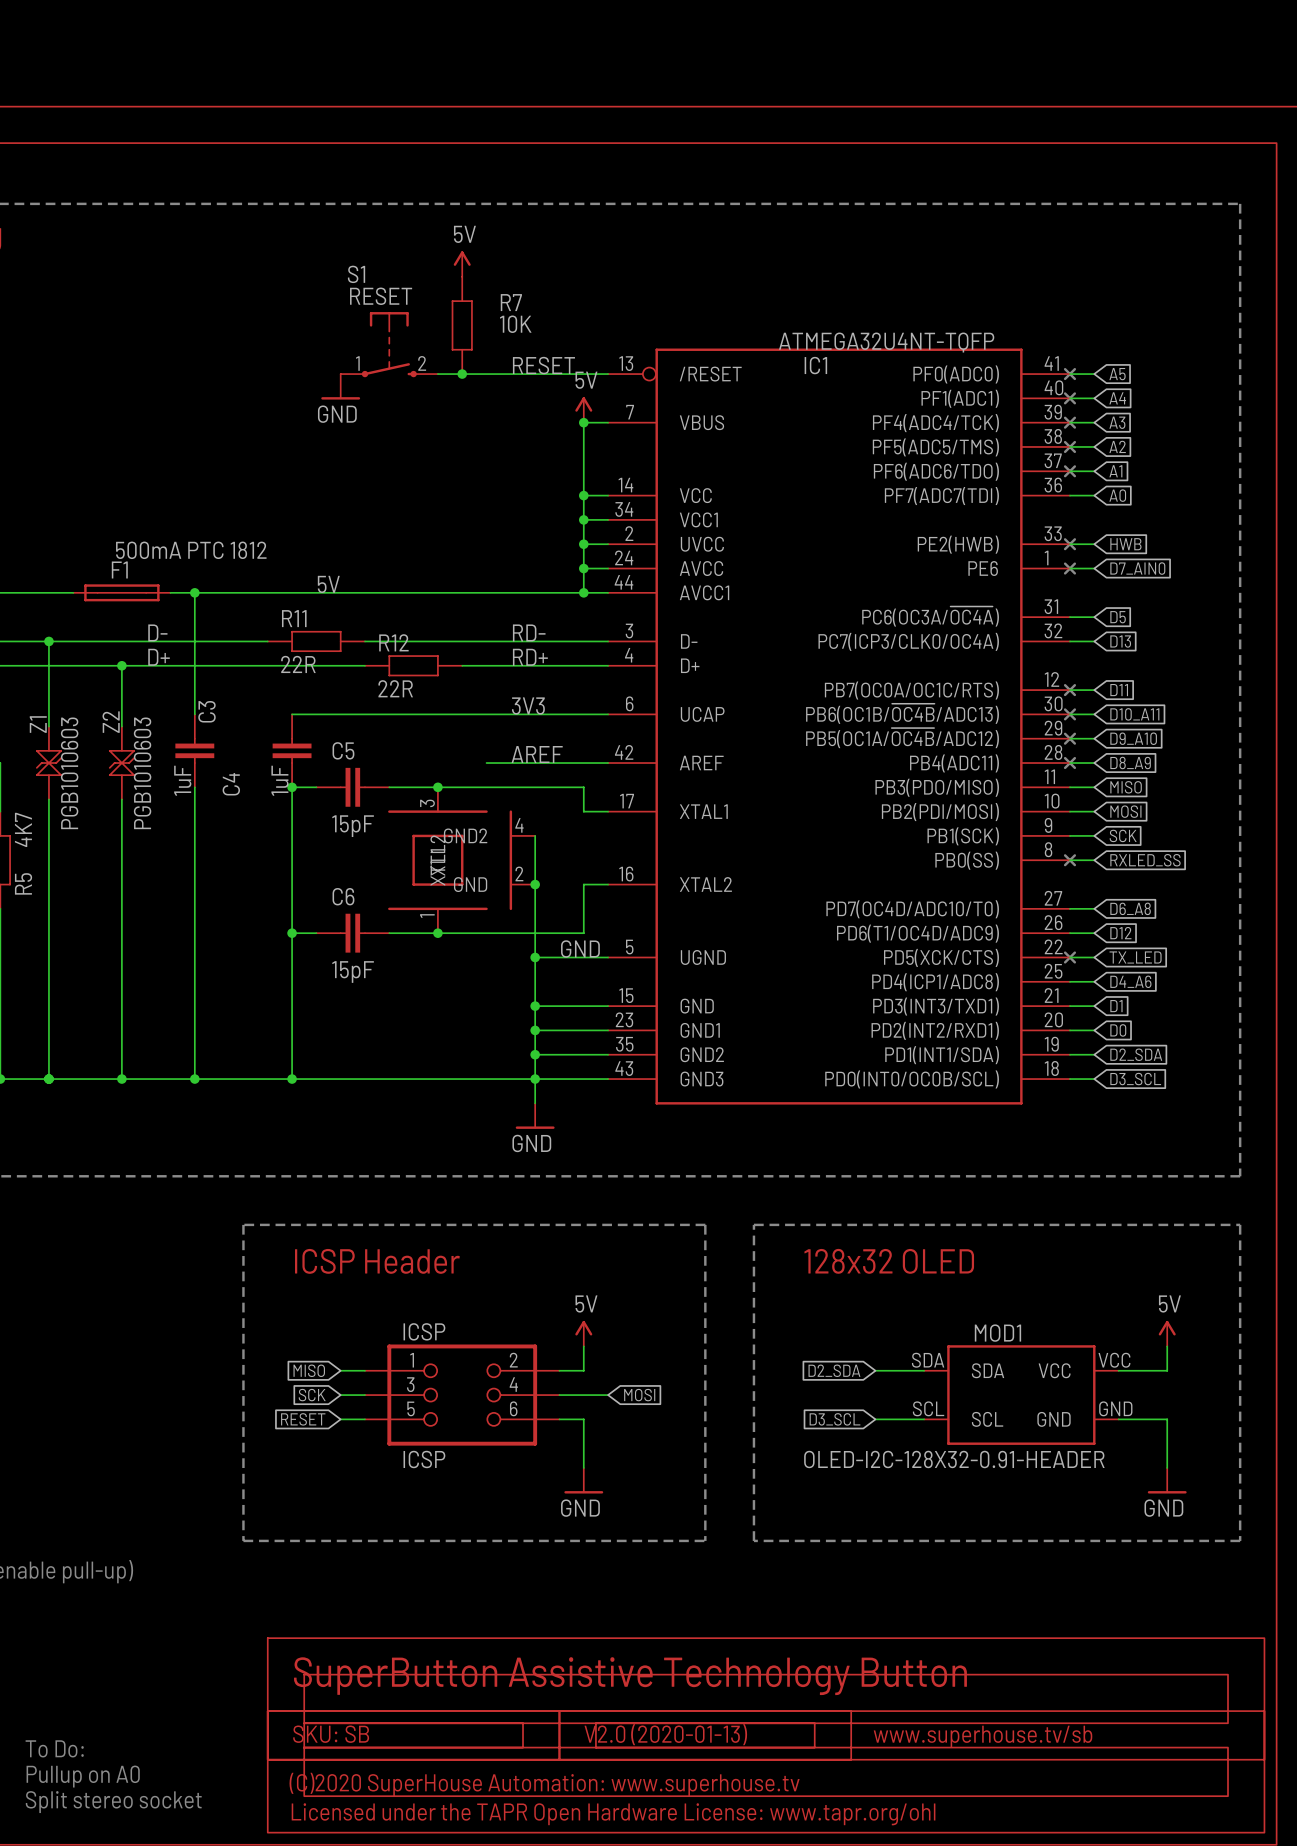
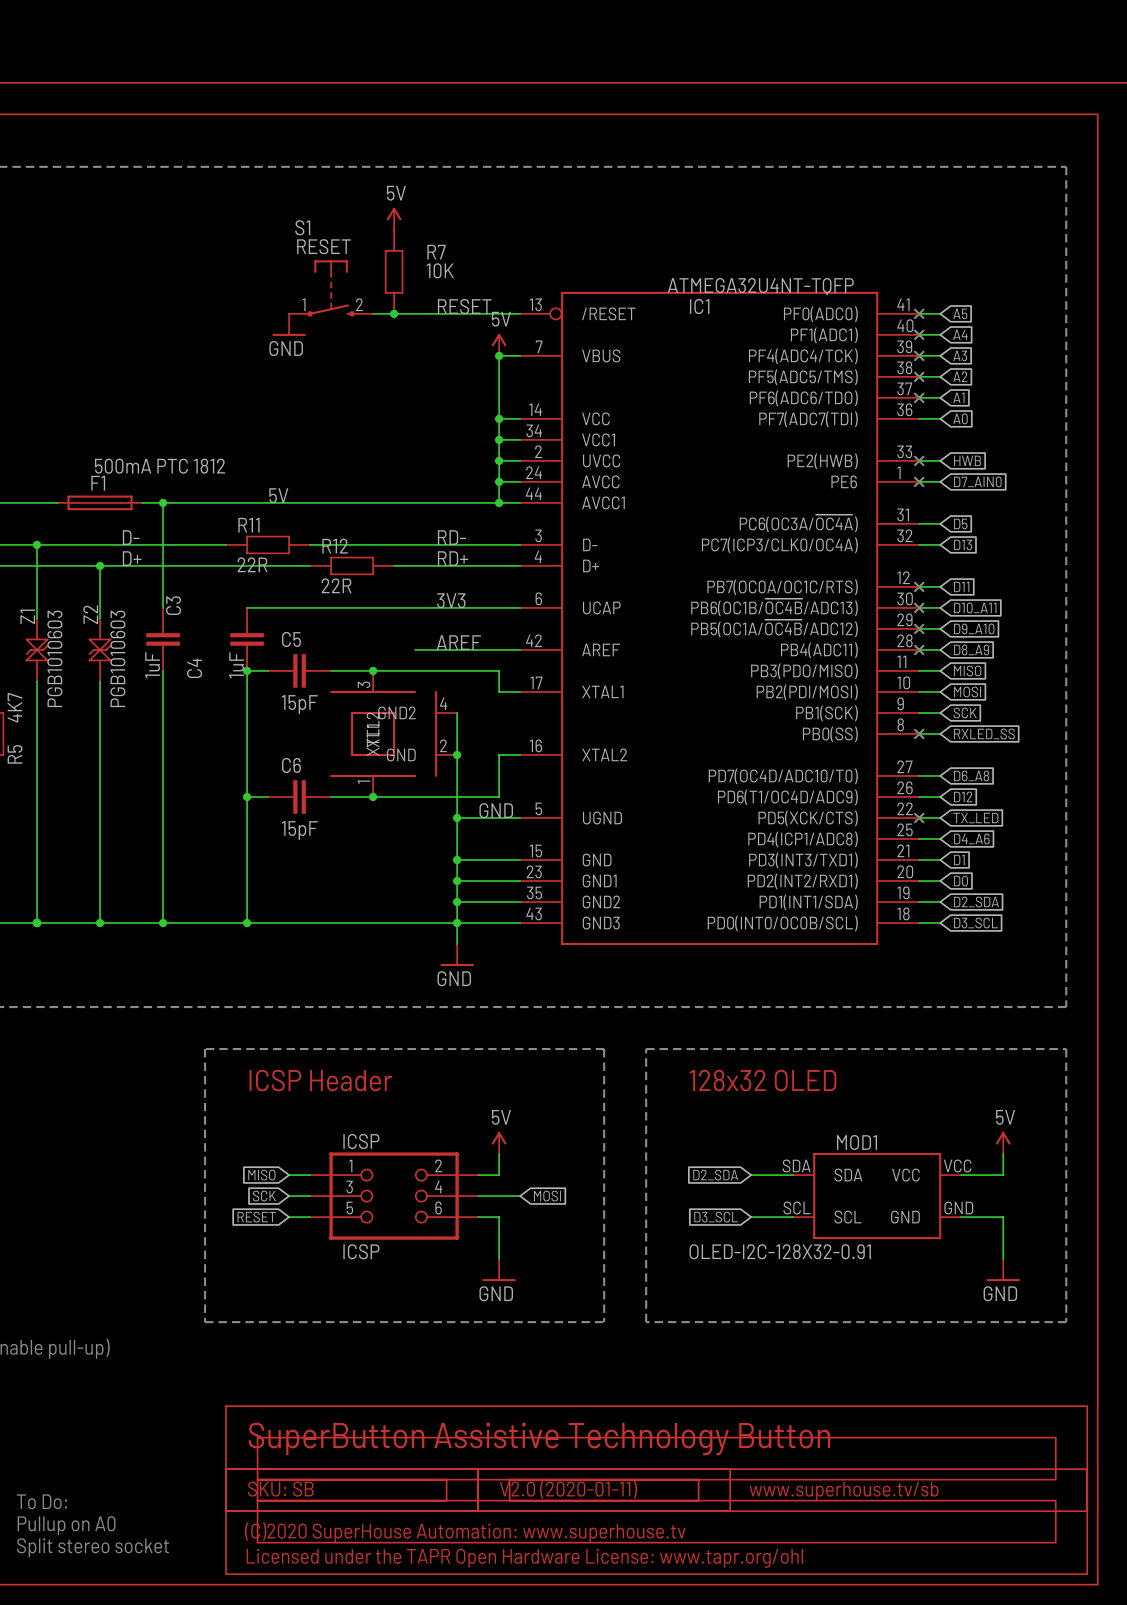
MOD1 value: OLED-I2C-128X32-0.91-HEADER (954, 1459) -> OLED-I2C-128X32-0.91 (780, 1251)
text: V2.0 (2020-01-13) (665, 1734) -> V2.0 (2020-01-11) (568, 1489)

